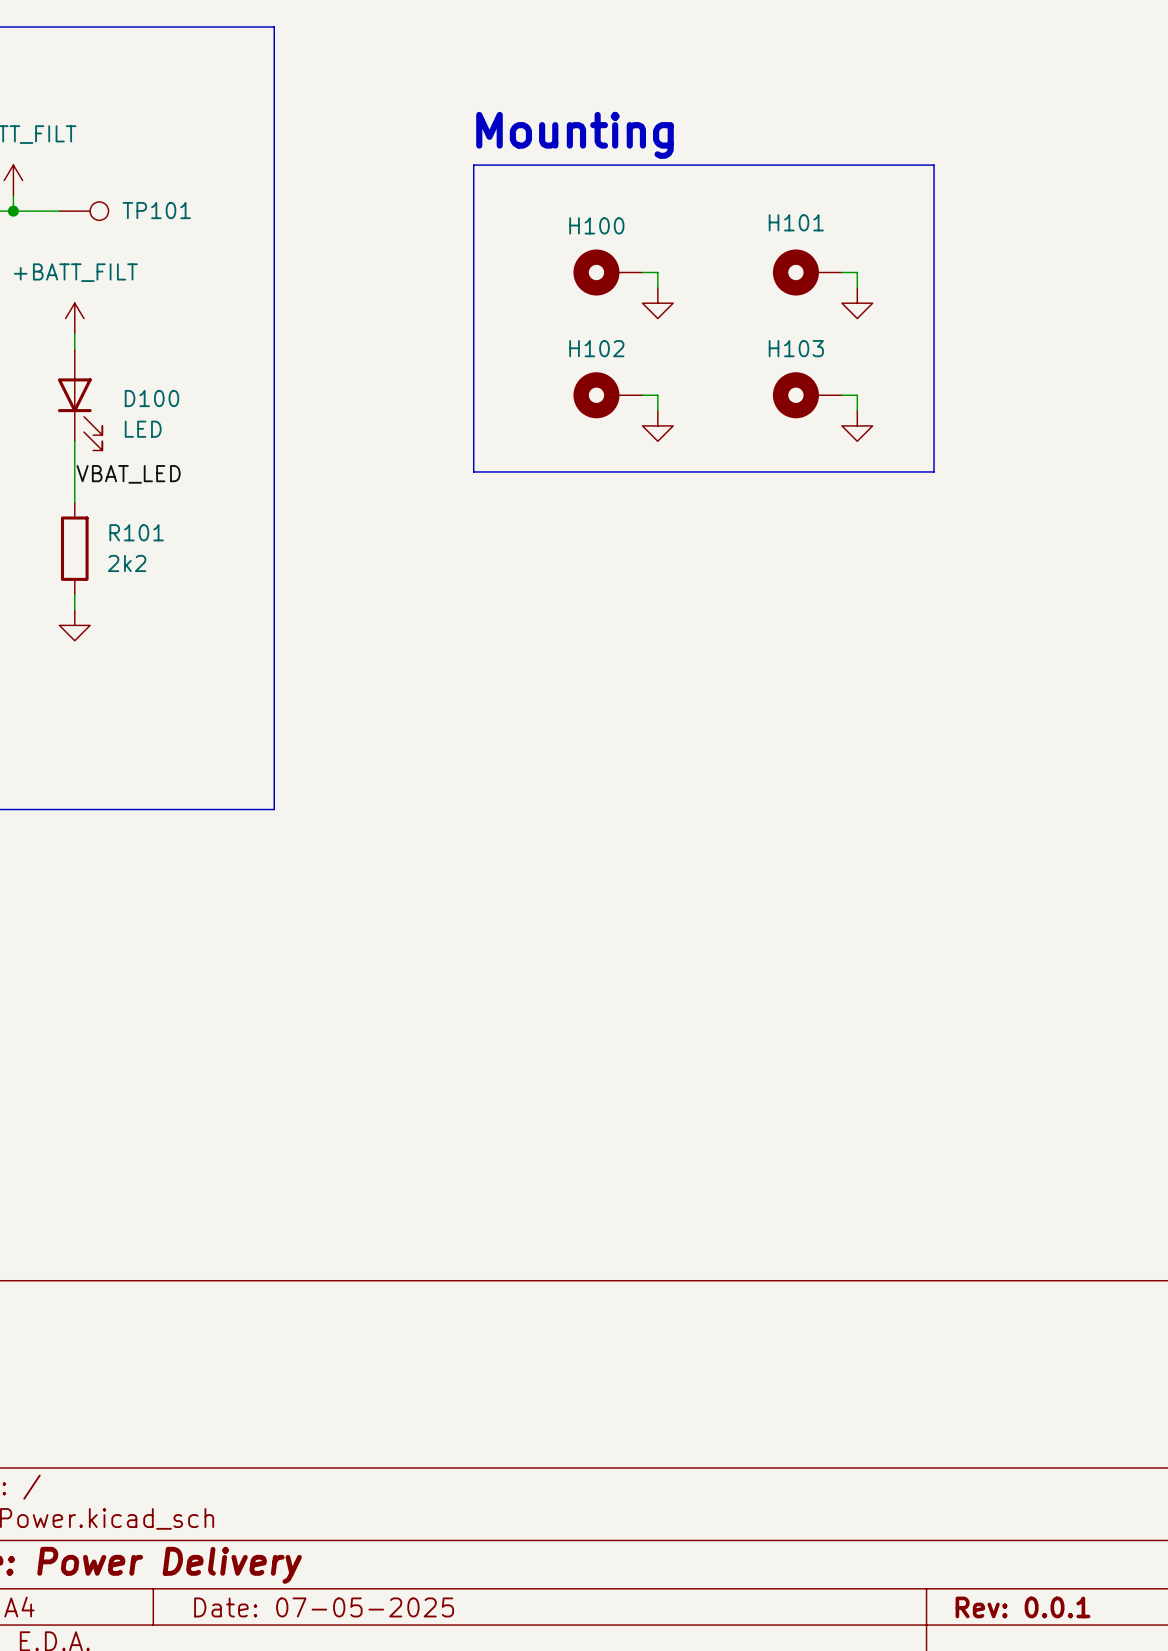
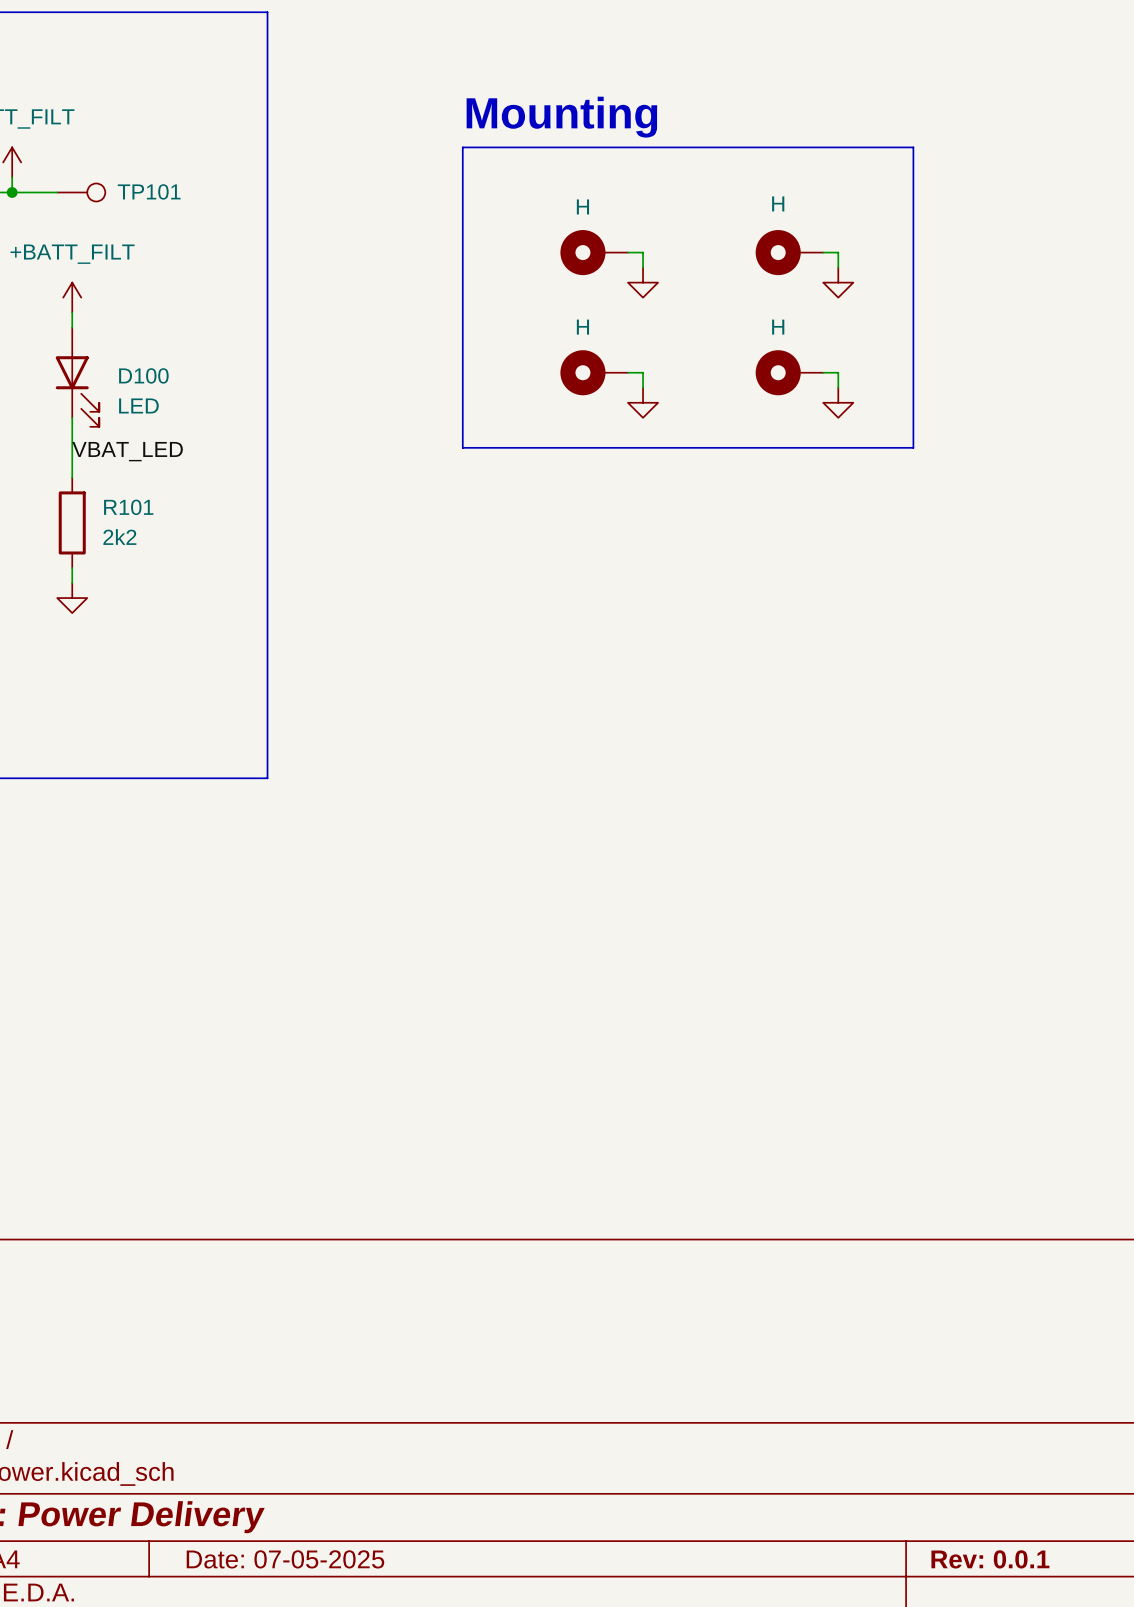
H101 name: H101 (796, 222) -> H (778, 203)
H100 name: H100 (596, 225) -> H (582, 206)
H102 name: H102 (596, 348) -> H (582, 327)
H103 name: H103 (796, 348) -> H (778, 327)

